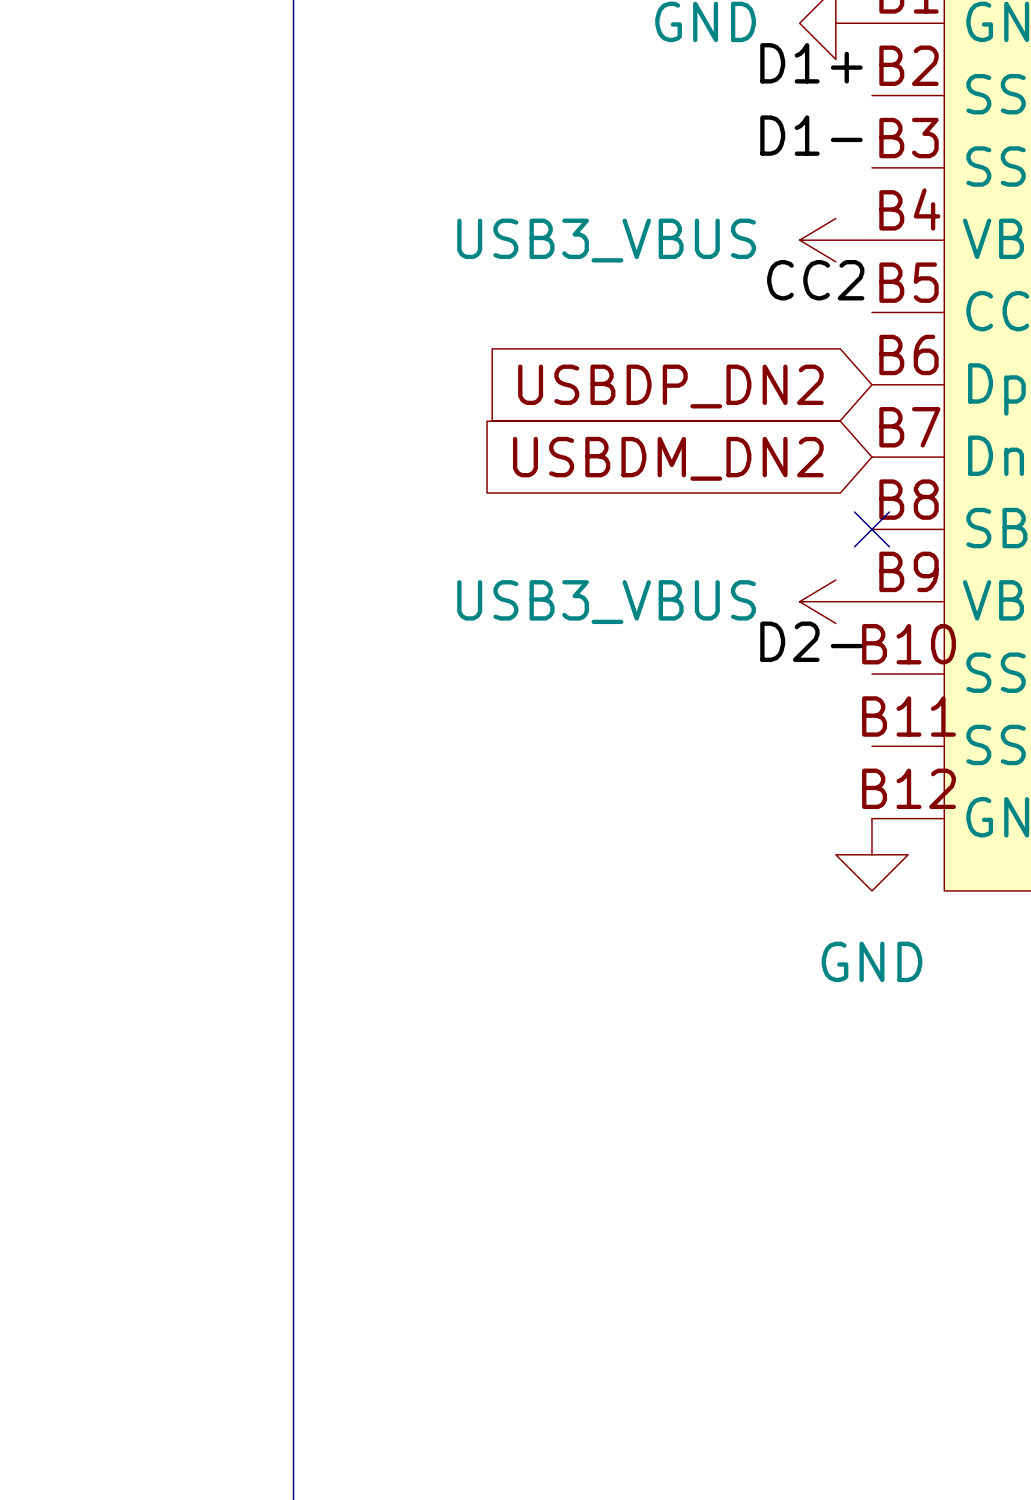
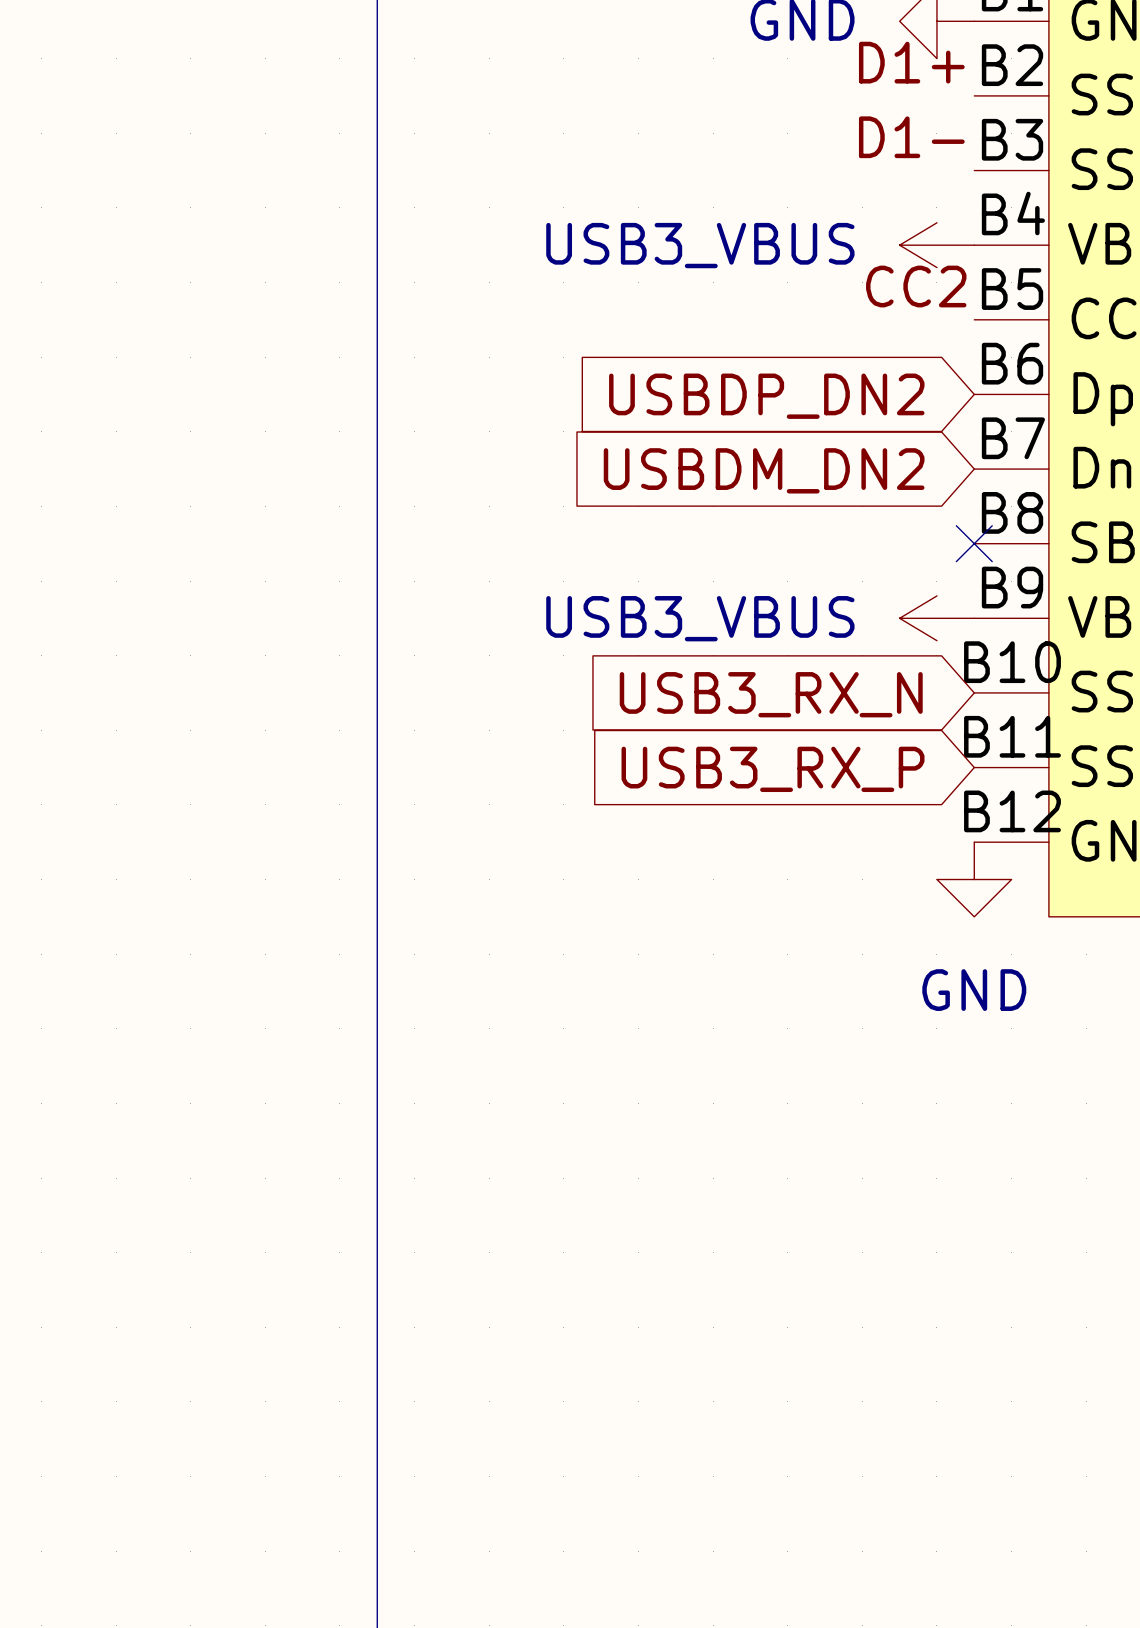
label: D2- (811, 641) -> none
global label: none -> USB3_RX_N (771, 694)
global label: none -> USB3_RX_P (773, 769)

